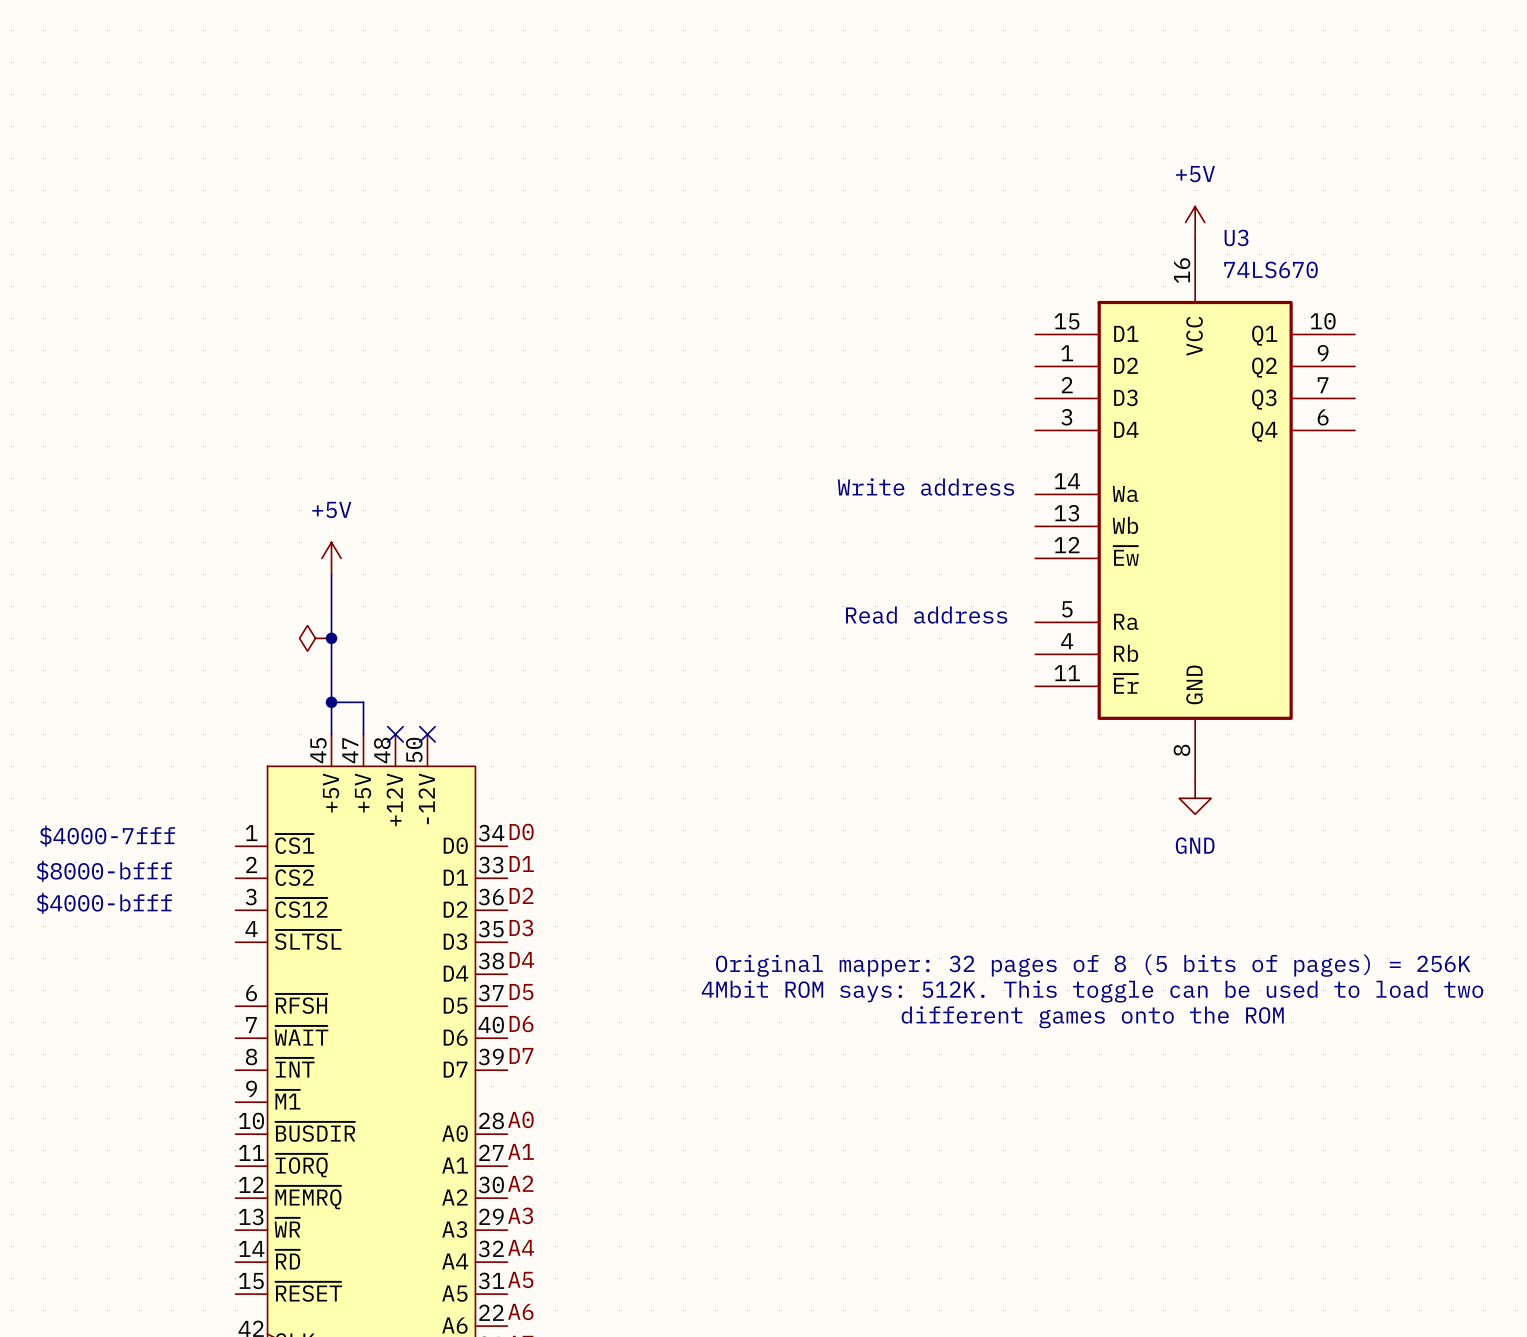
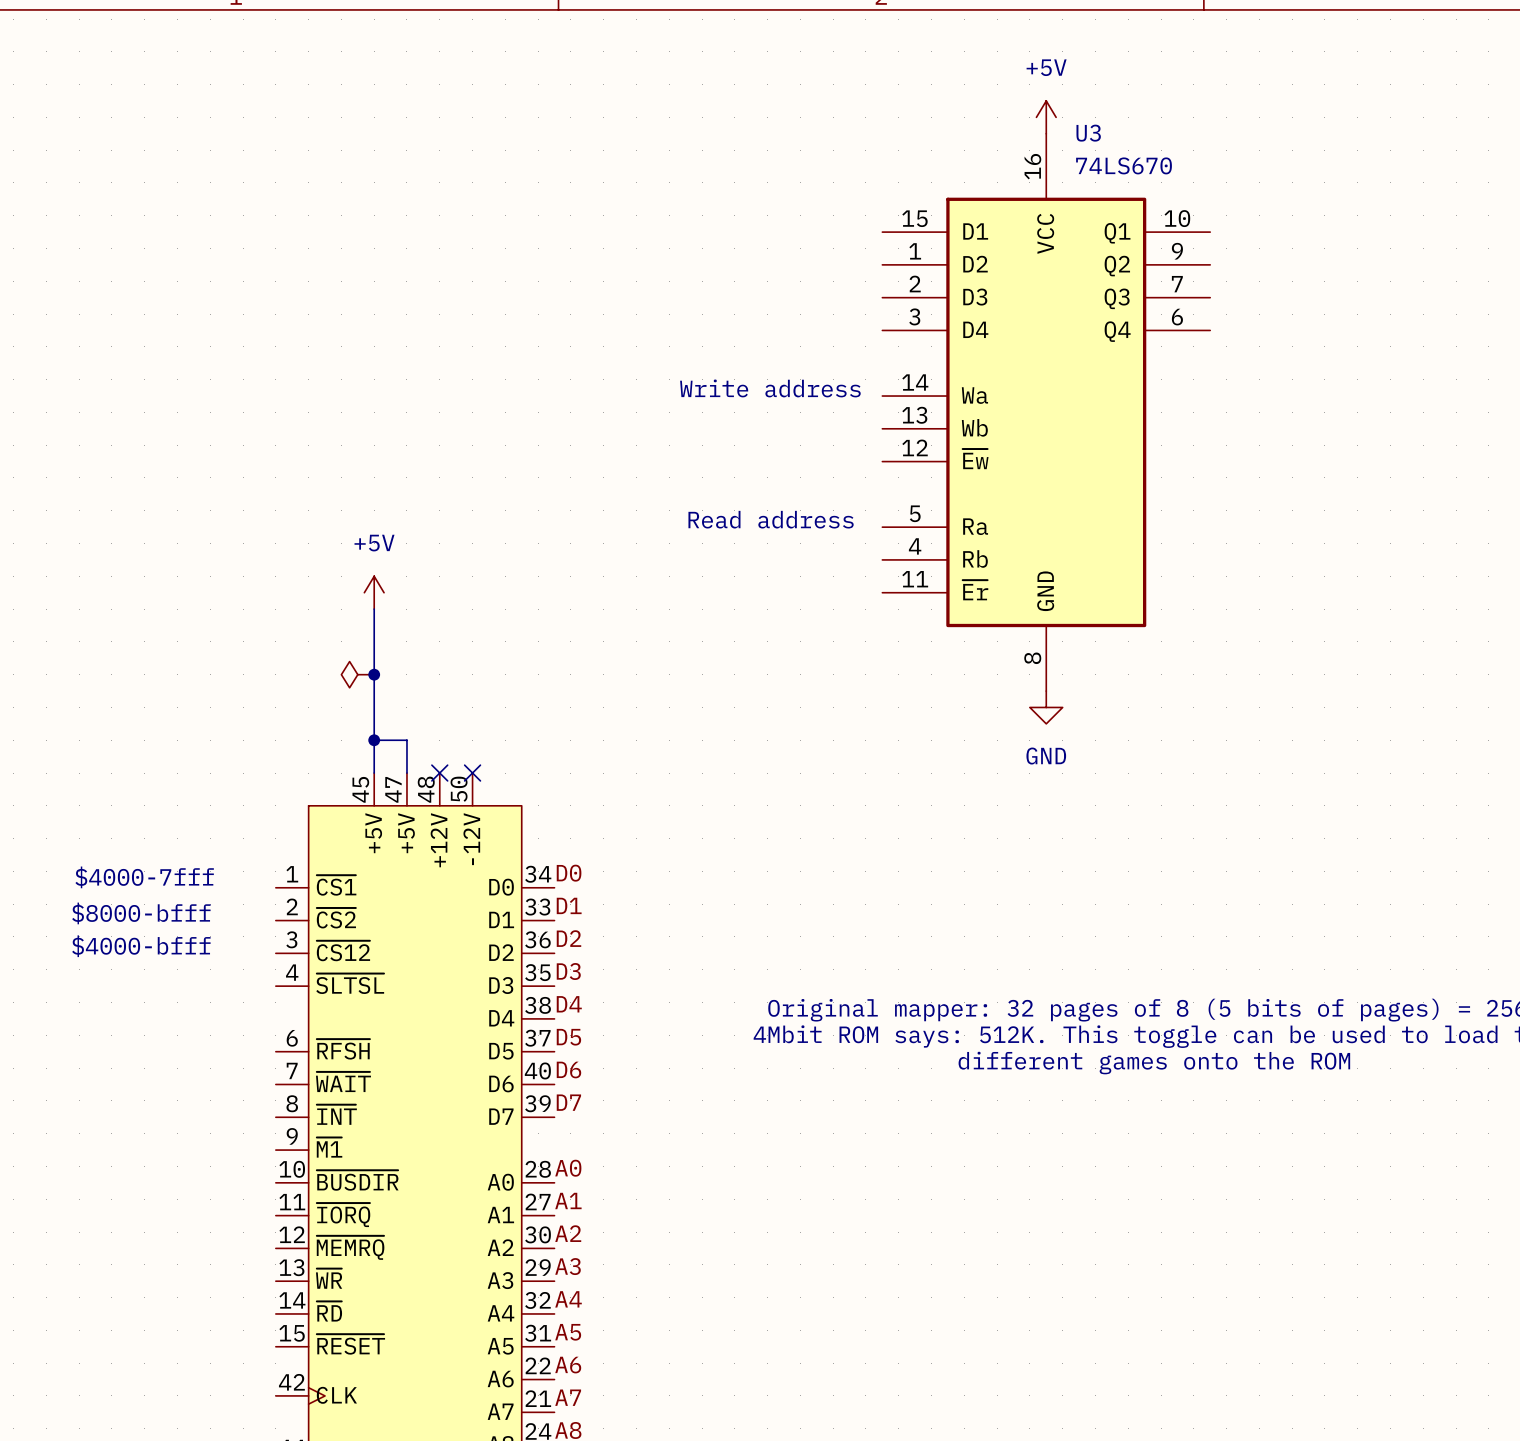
power symbol position: +5V (1195, 222) -> +5V (1046, 117)
text position: Write address (926, 487) -> Write address (770, 388)
U3 position: (1195, 510) -> (1046, 412)
text position: Read address (926, 615) -> Read address (771, 519)
power symbol position: GND (1195, 798) -> GND (1046, 707)

